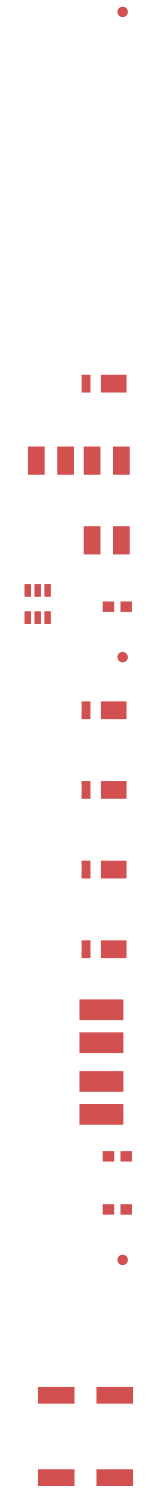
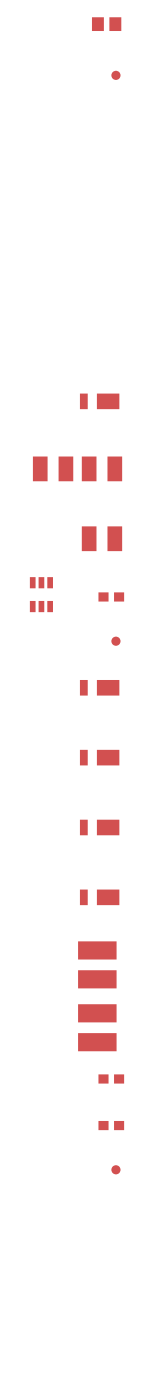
part: (85, 1395) -> none
part: (85, 1477) -> none

